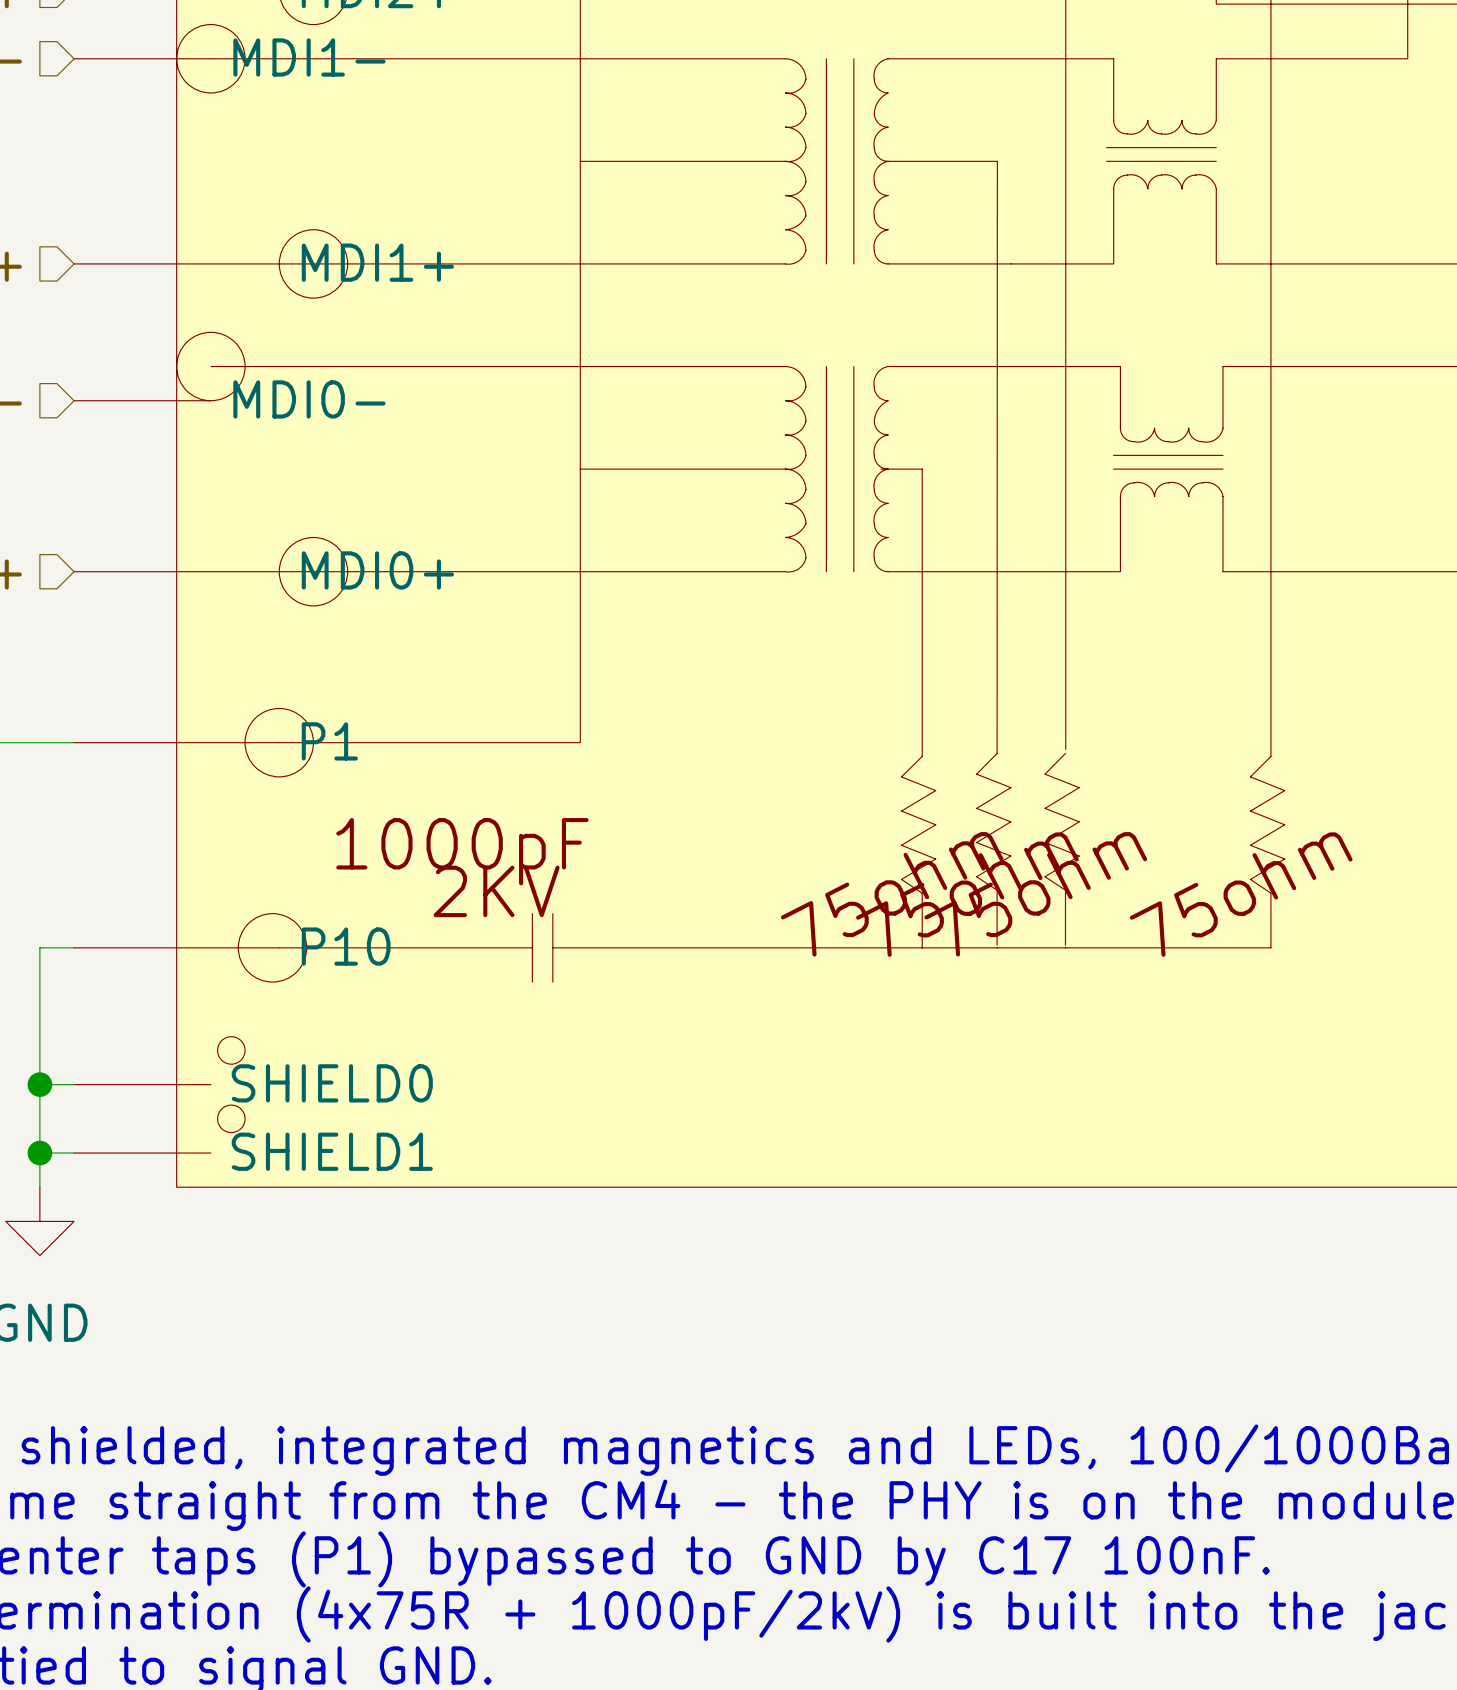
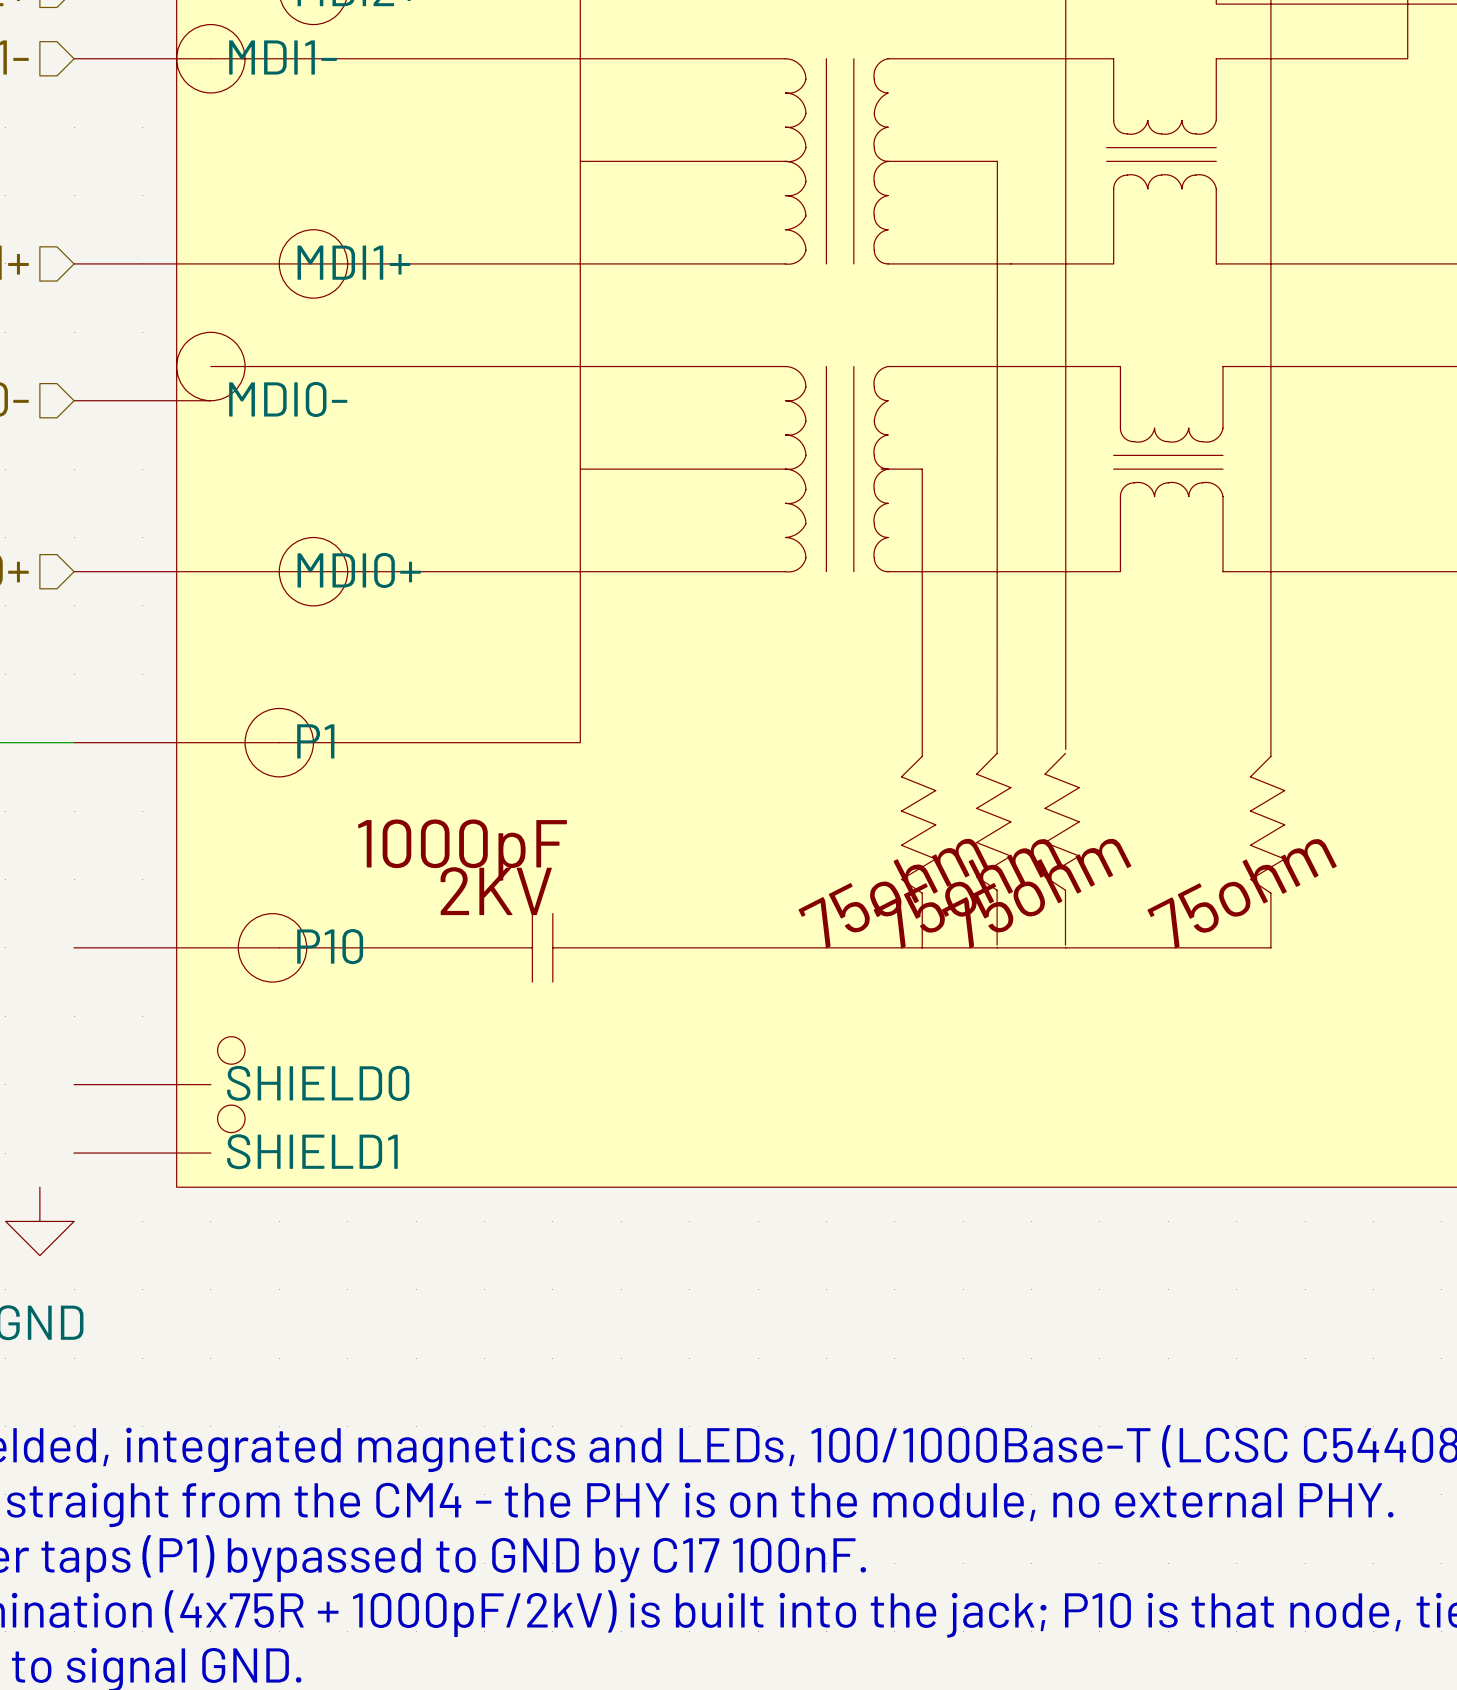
wire: (74, 947) (39, 947) (39, 1187) -> none
wire: (39, 1084) (74, 1084) -> none
junction: (39, 1084) -> none
wire: (39, 1153) (74, 1153) -> none
junction: (39, 1153) -> none

